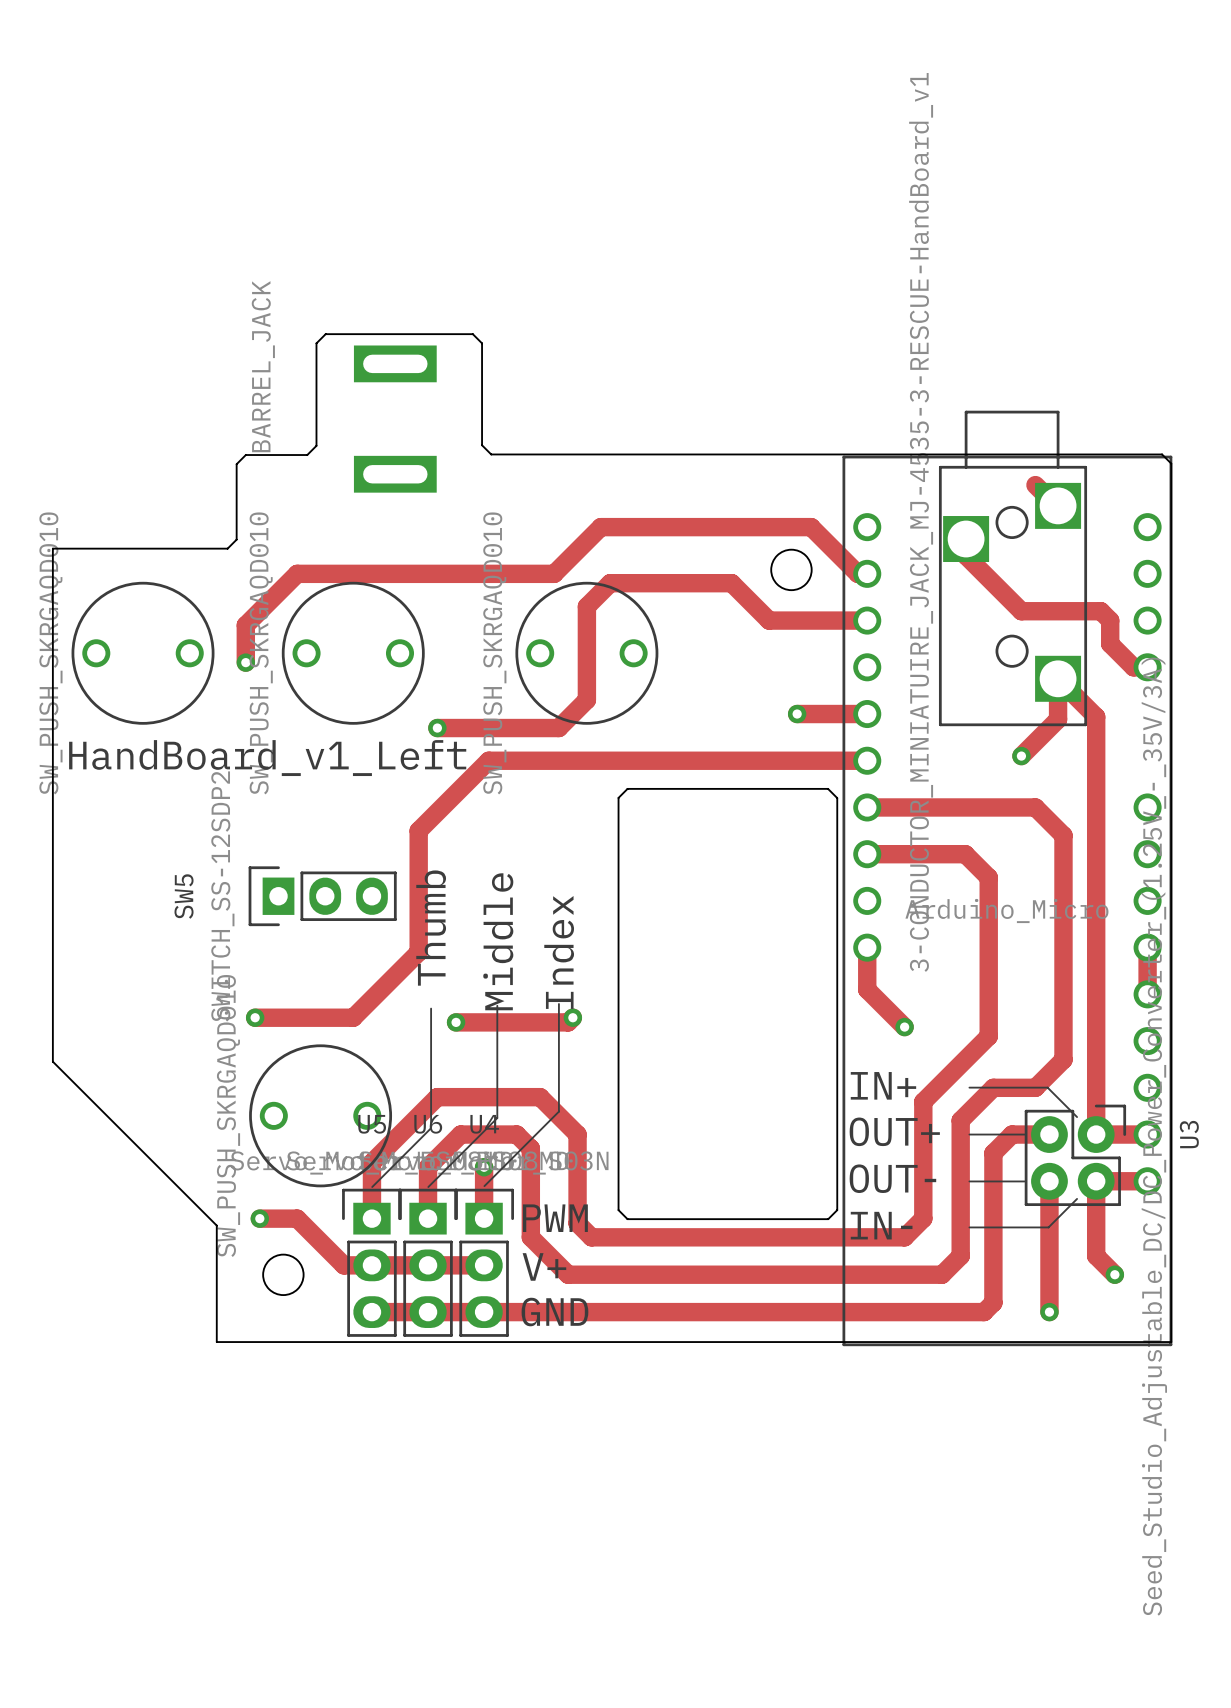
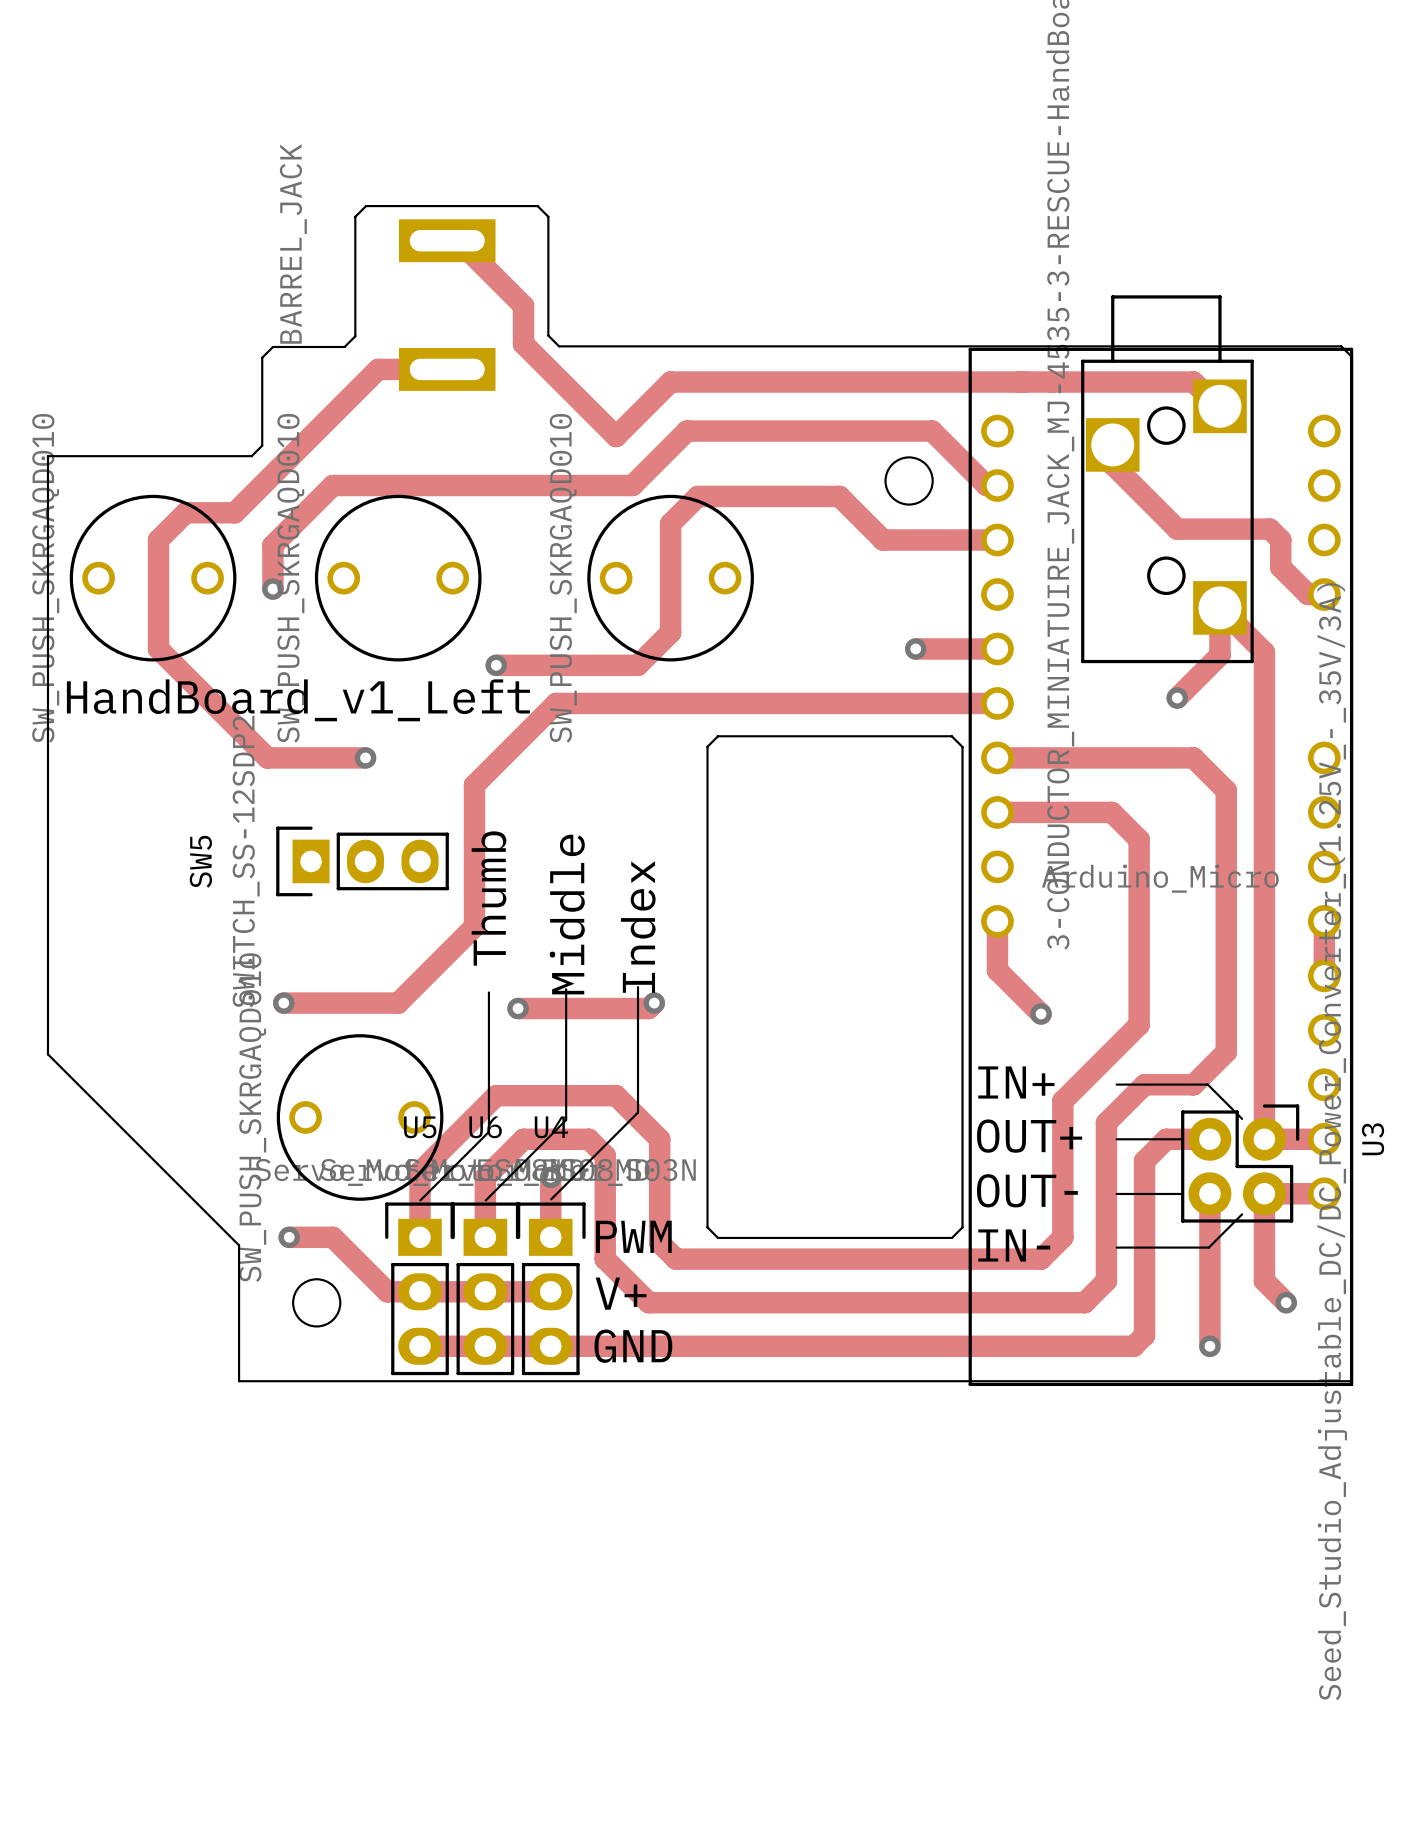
track: none -> (447, 240) (458, 240) (523, 305) (523, 343) (616, 436) (670, 382) (1193, 382)
track: none -> (447, 369) (378, 369) (234, 512) (185, 512) (158, 540) (158, 648) (267, 757) (365, 757)
via: none -> (365, 757)

